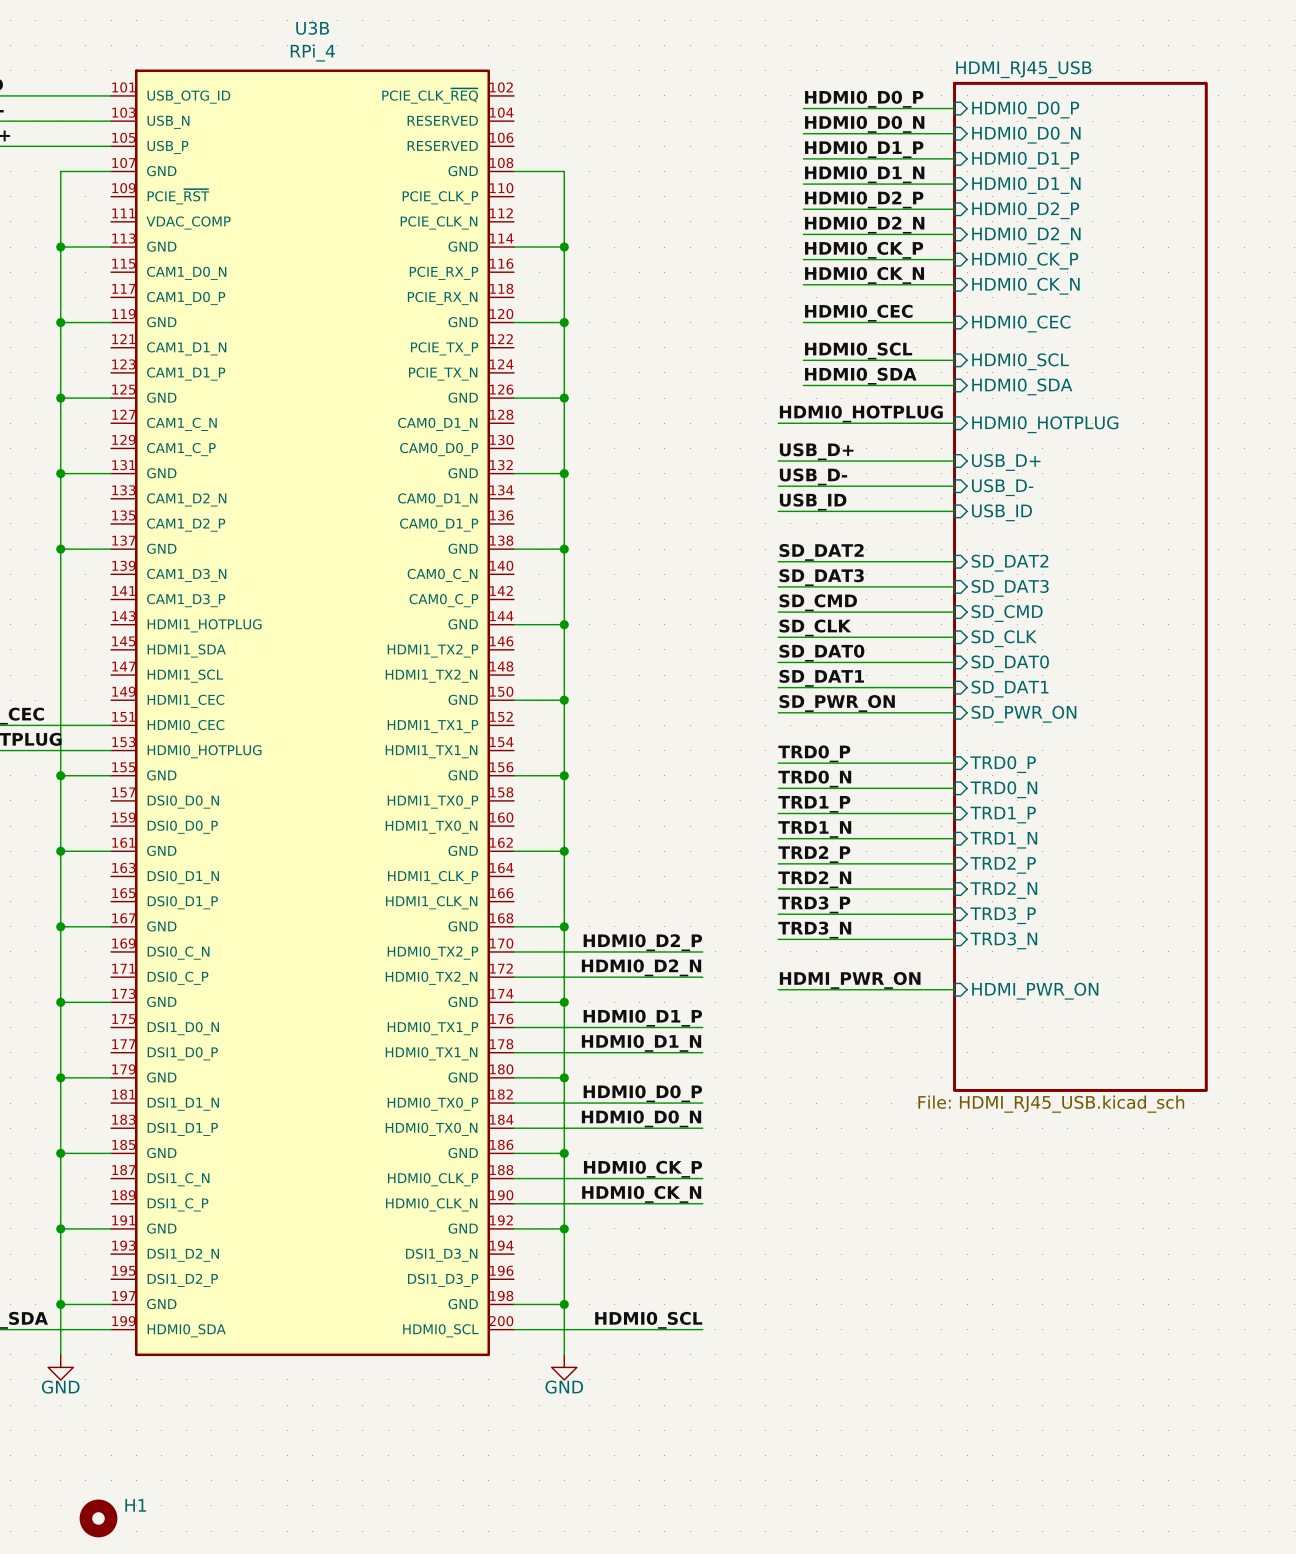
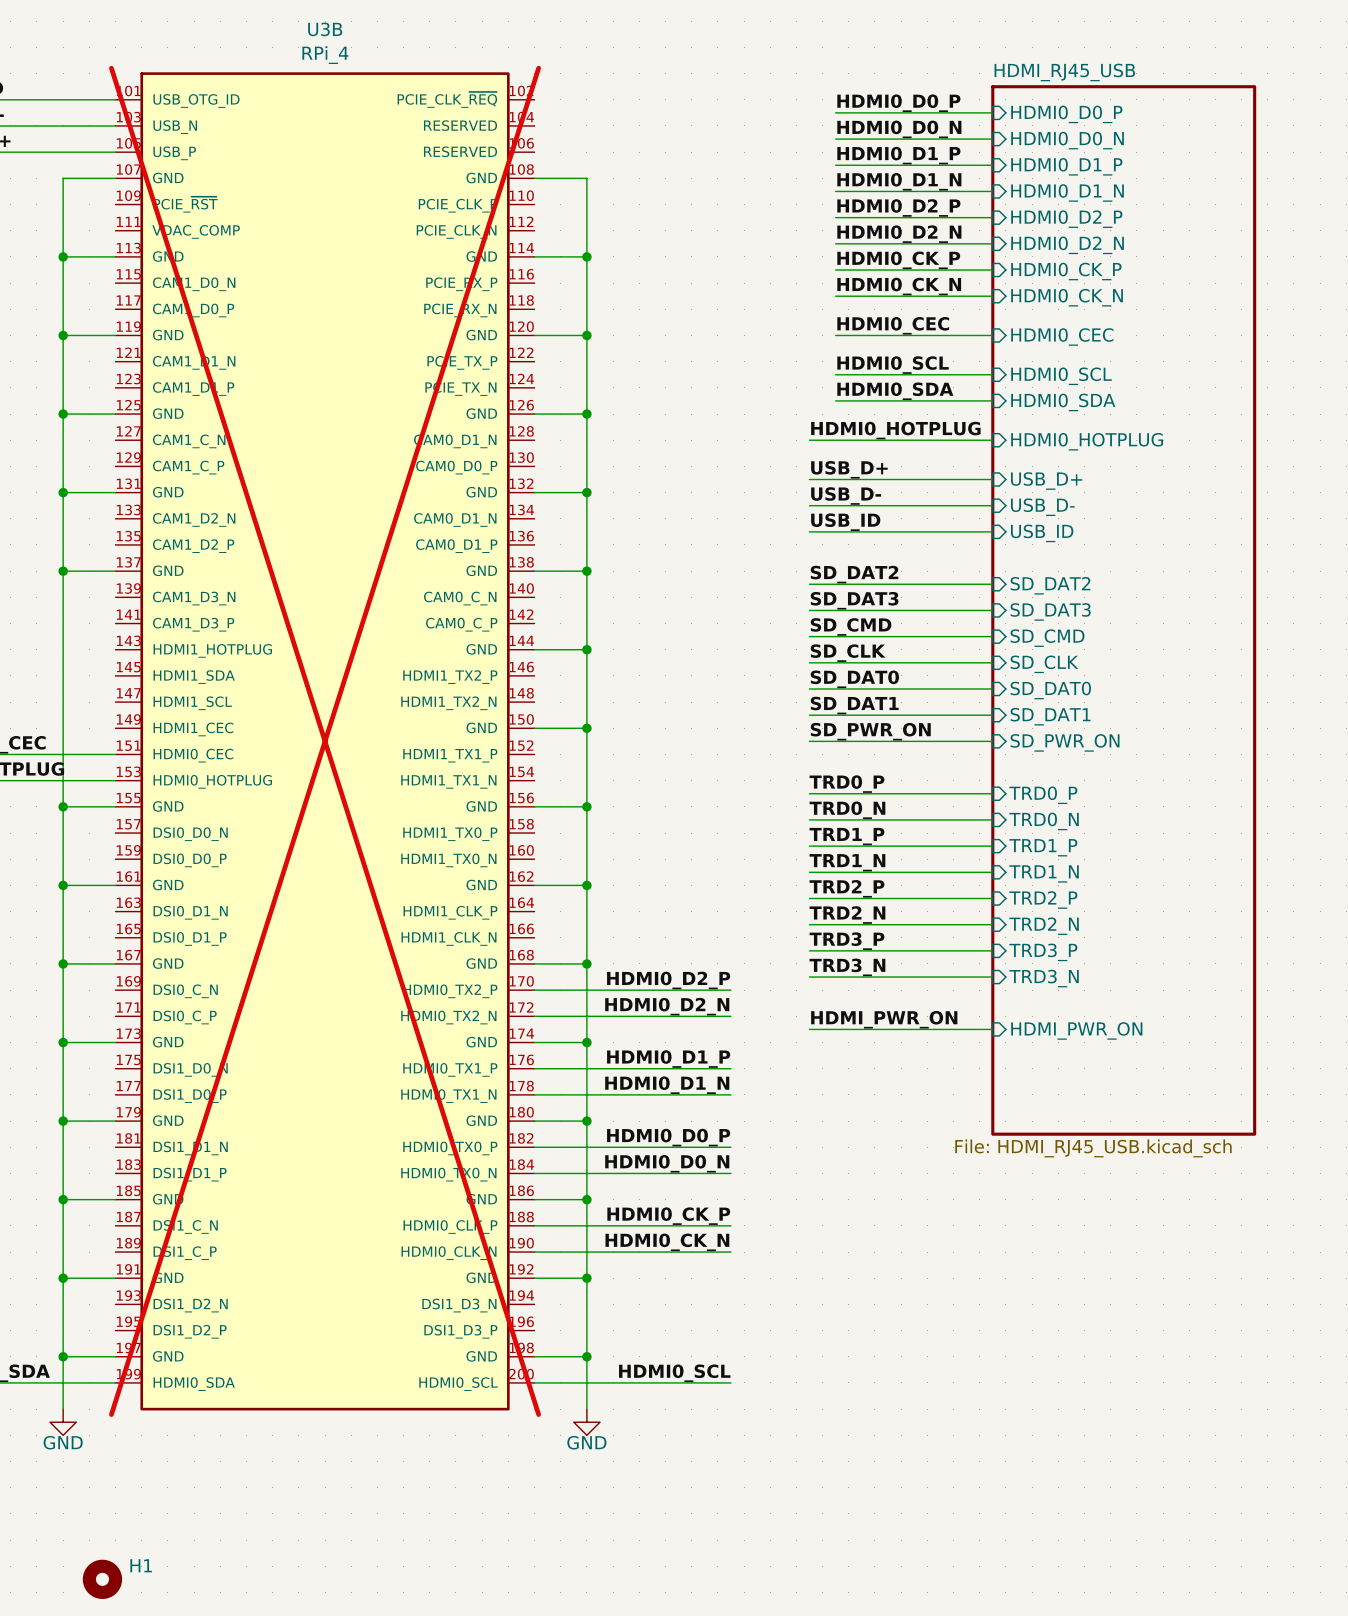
U3B do-not-place cross: none -> (325, 741)

